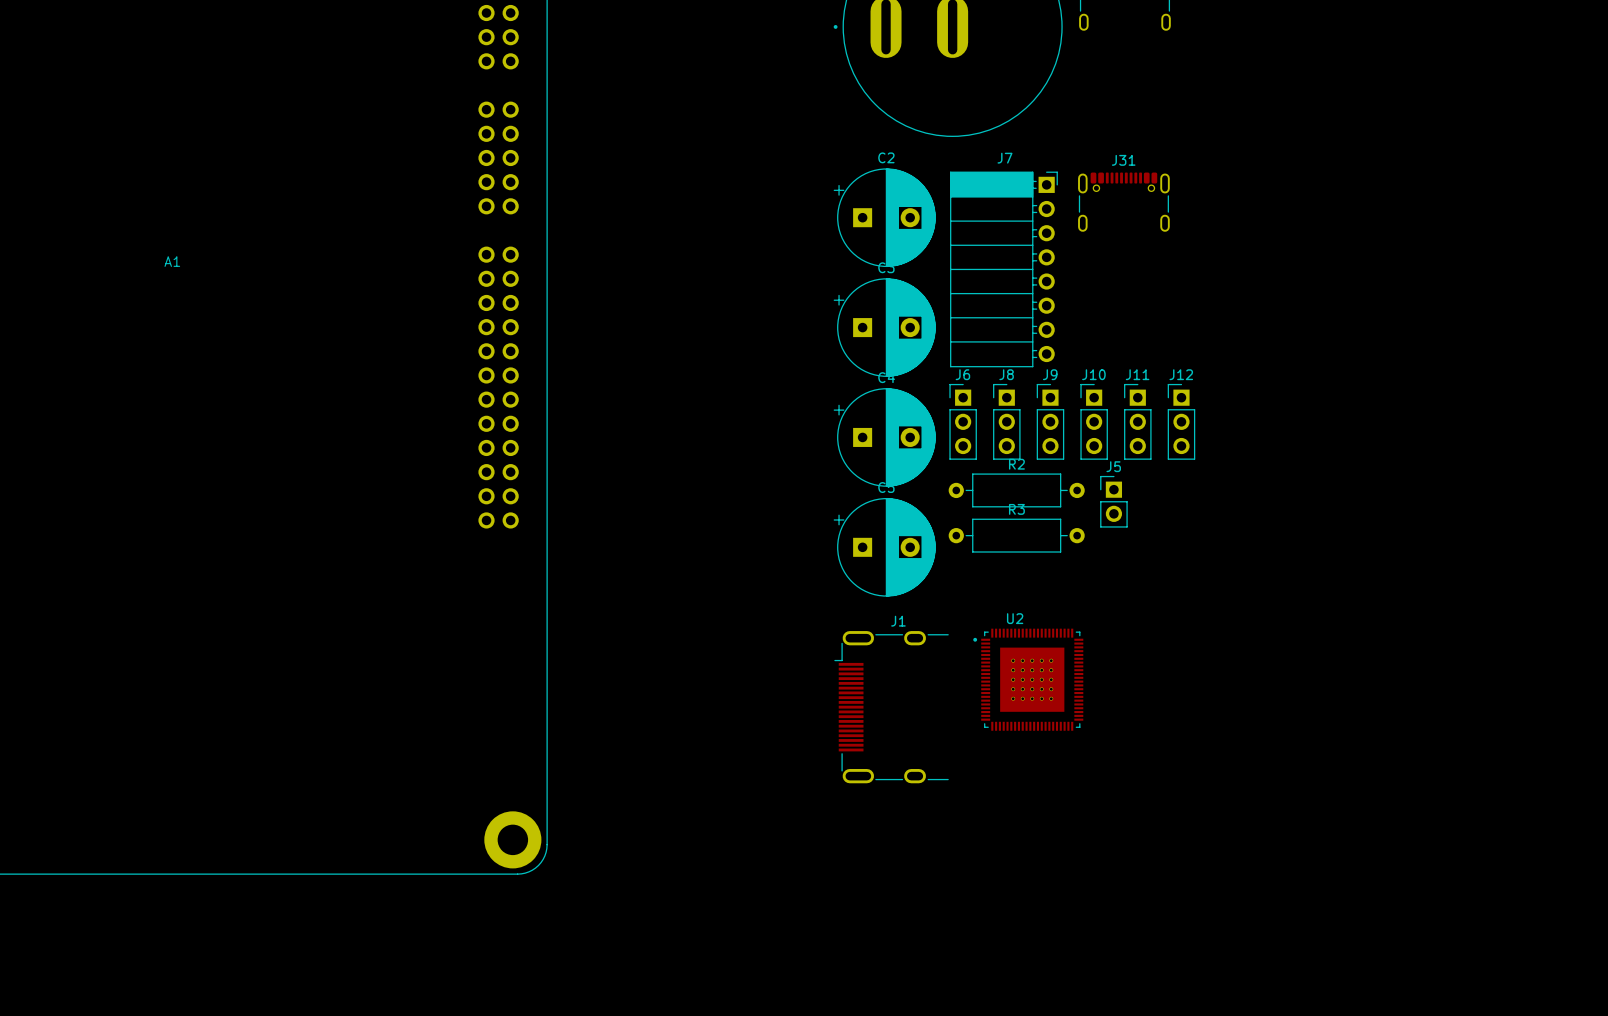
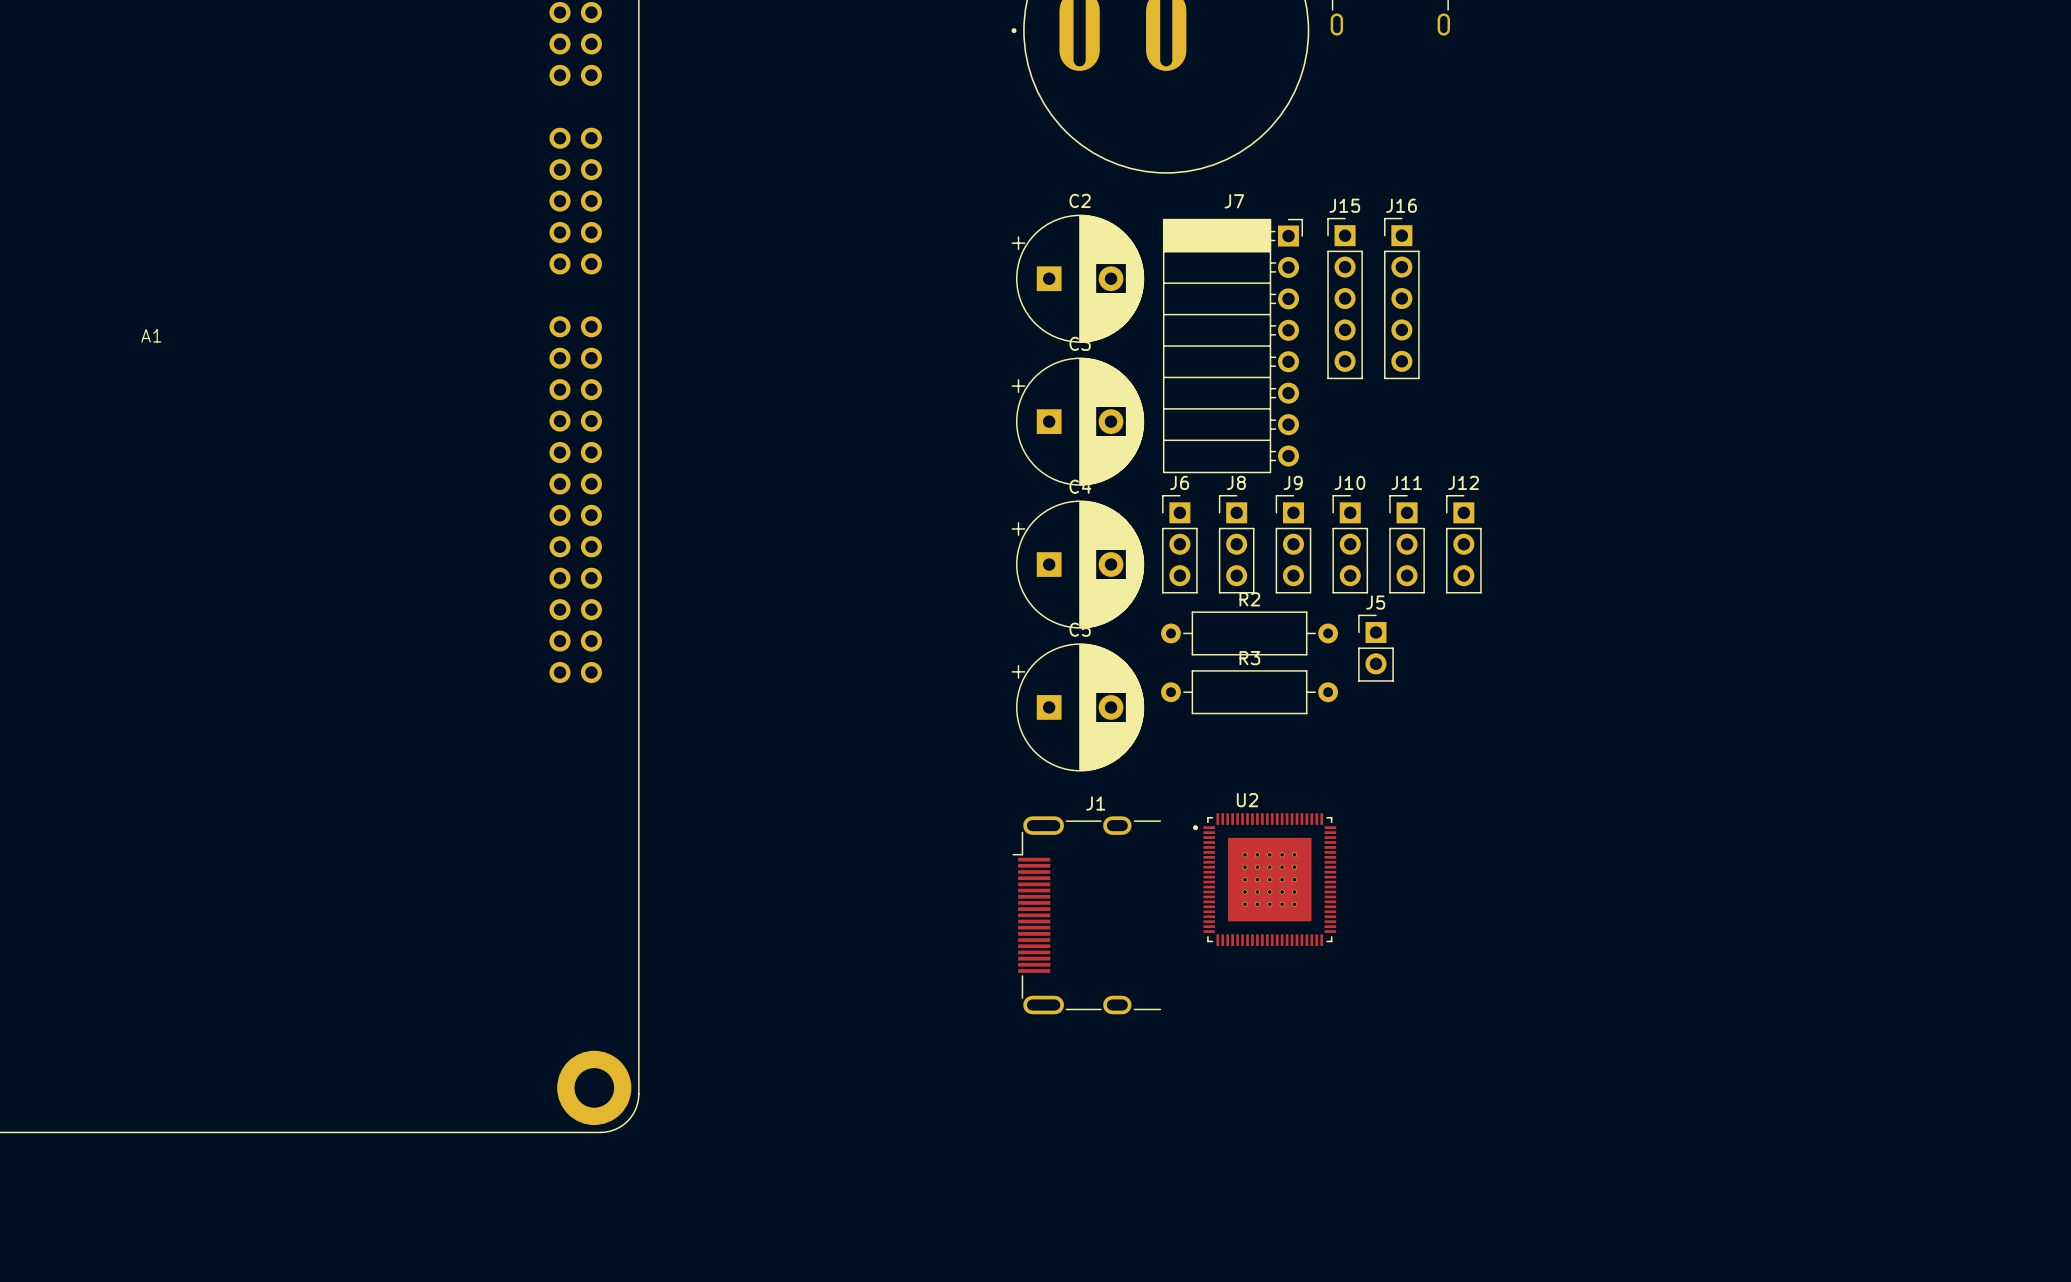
J31: (1123, 202) -> none
J15: none -> (1345, 298)
J16: none -> (1401, 298)

